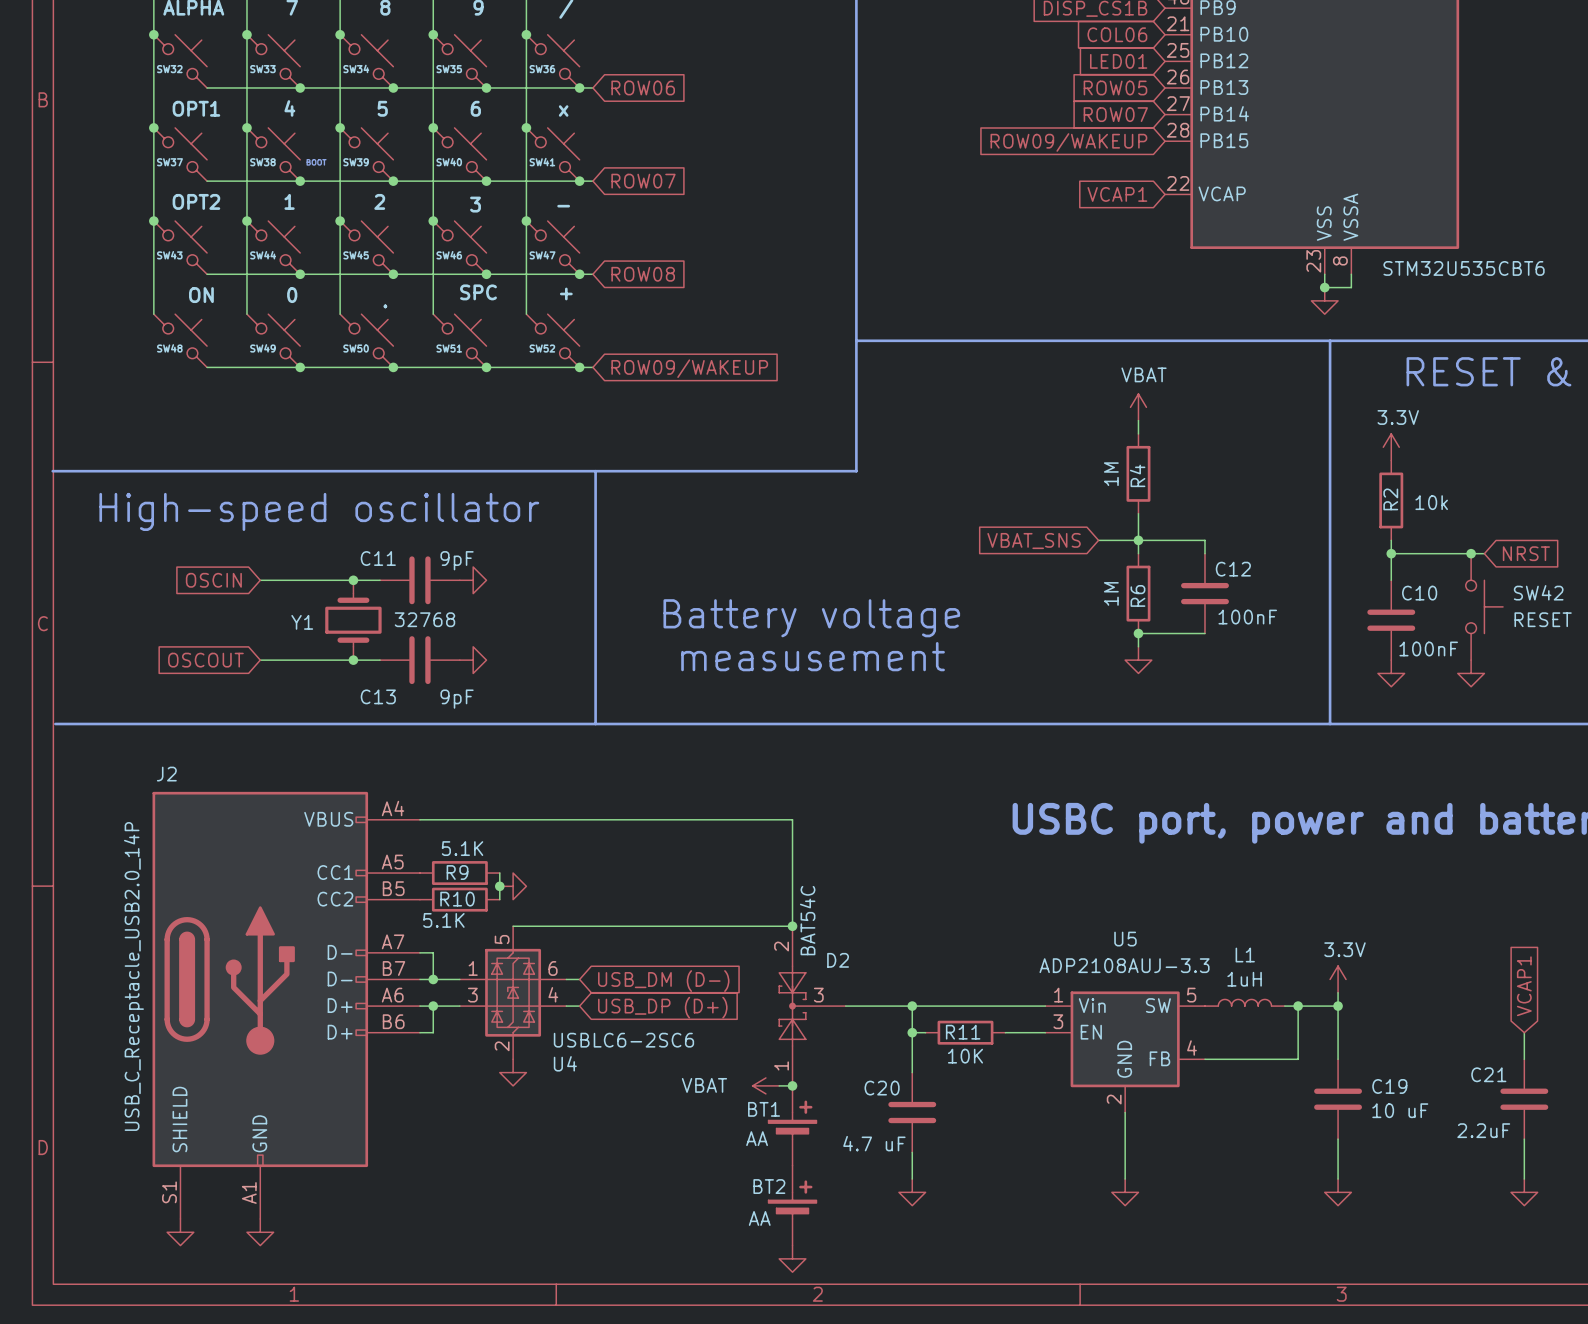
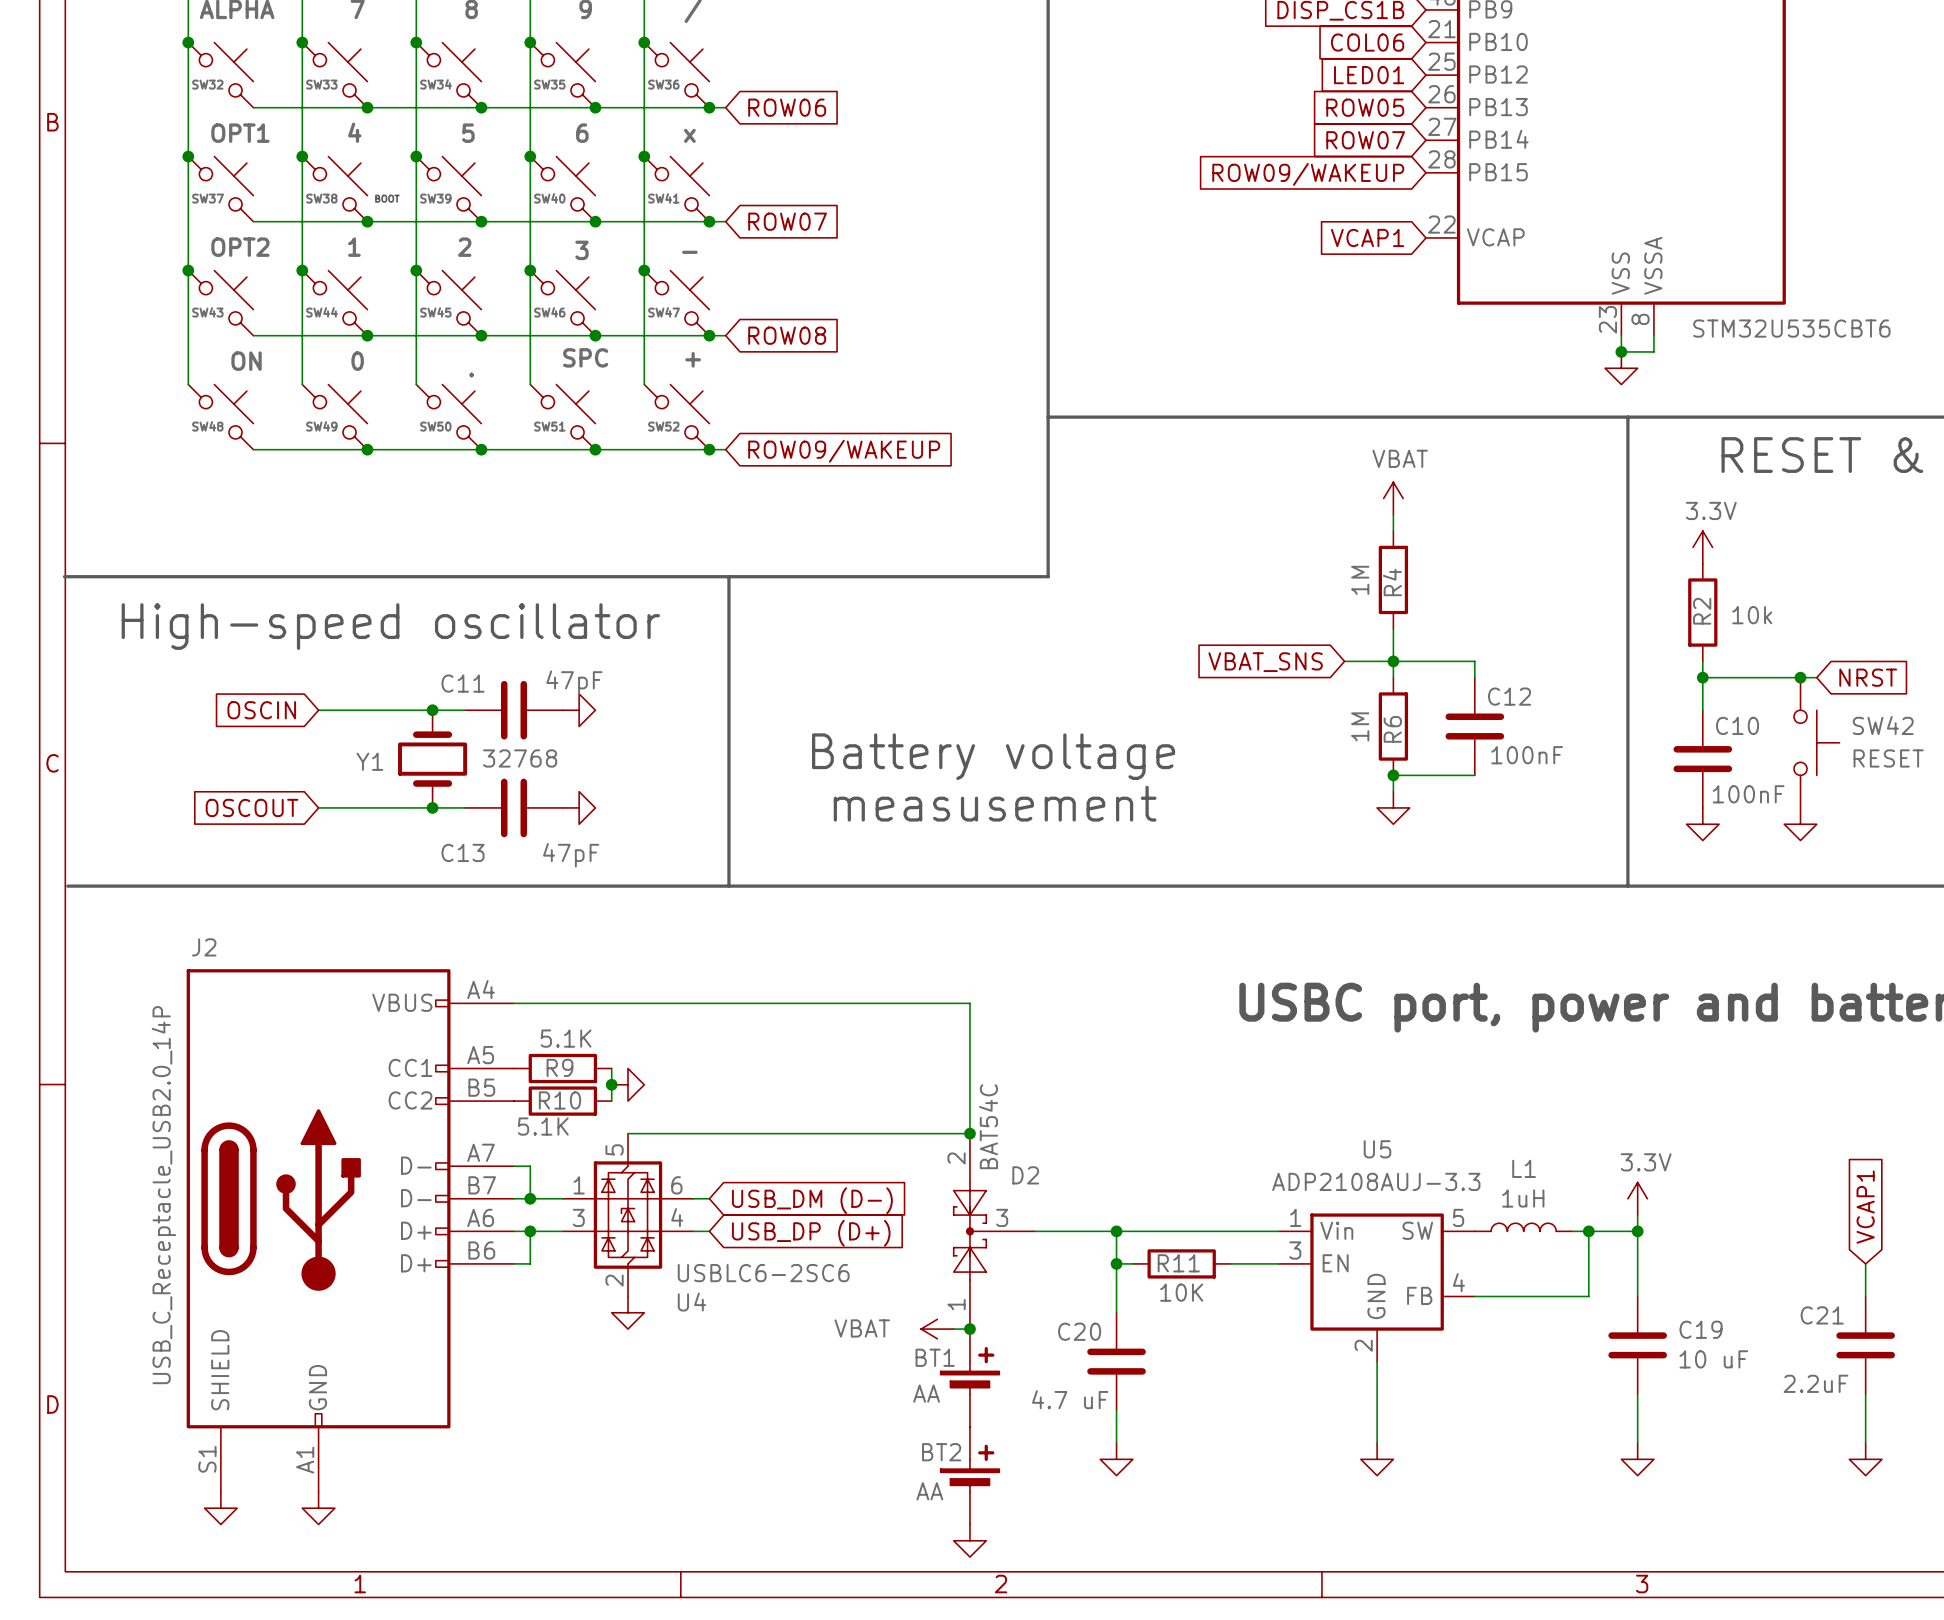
C11 value: 9pF (457, 560) -> 47pF (574, 682)
C13 value: 9pF (457, 699) -> 47pF (571, 855)

